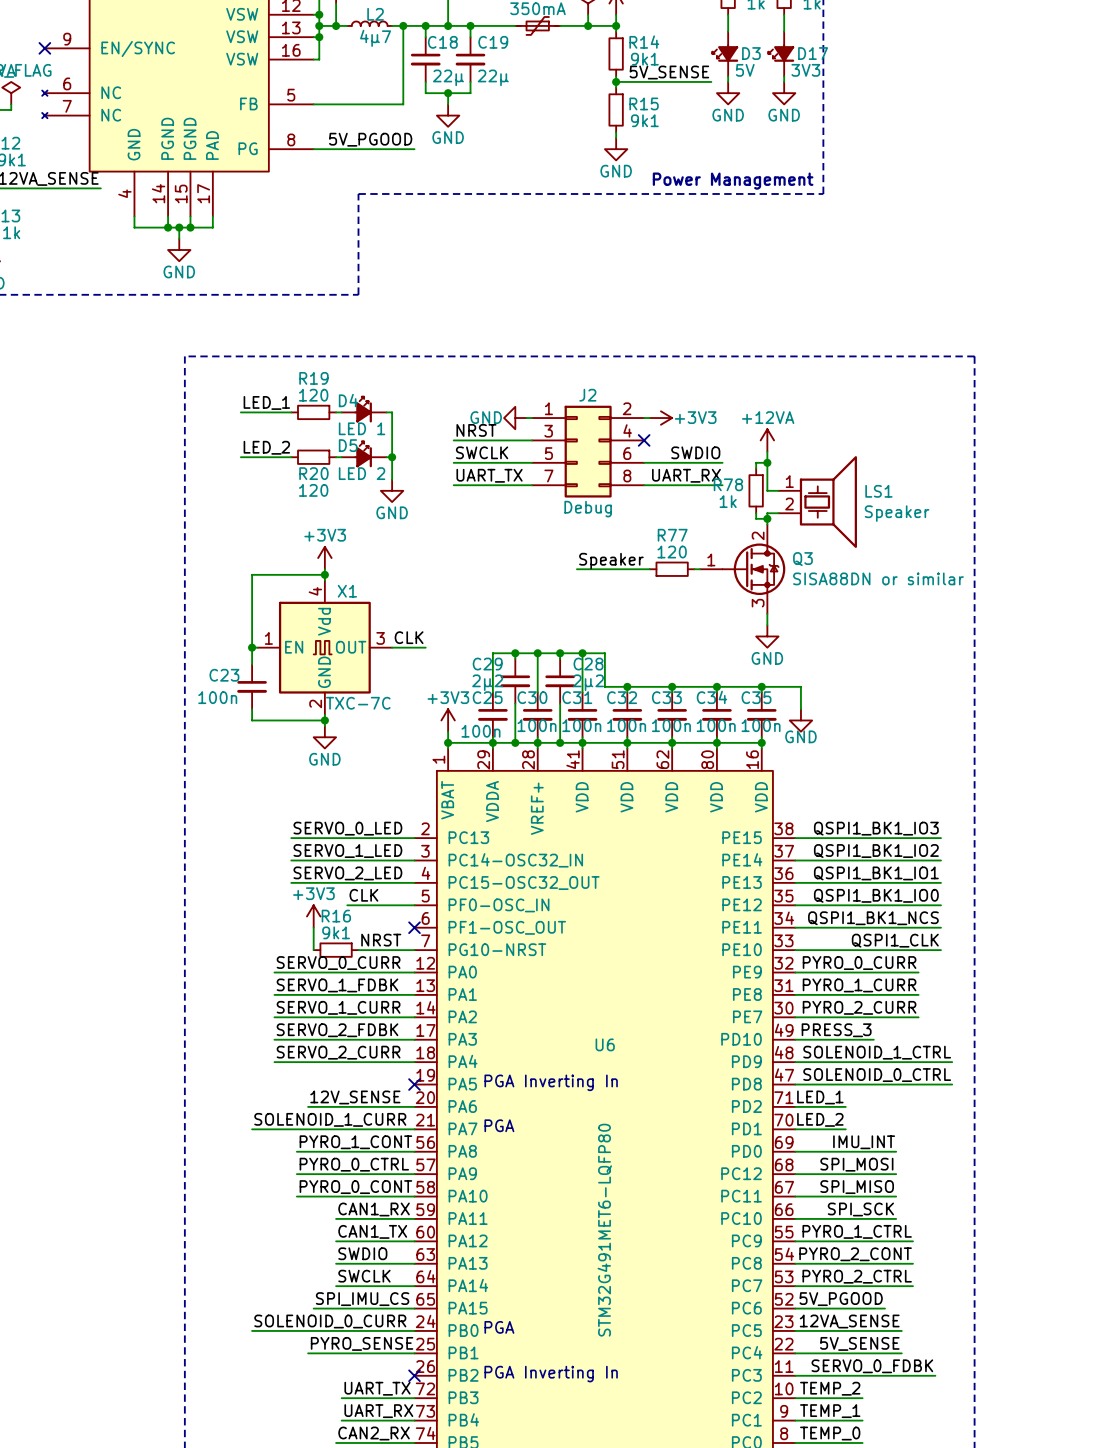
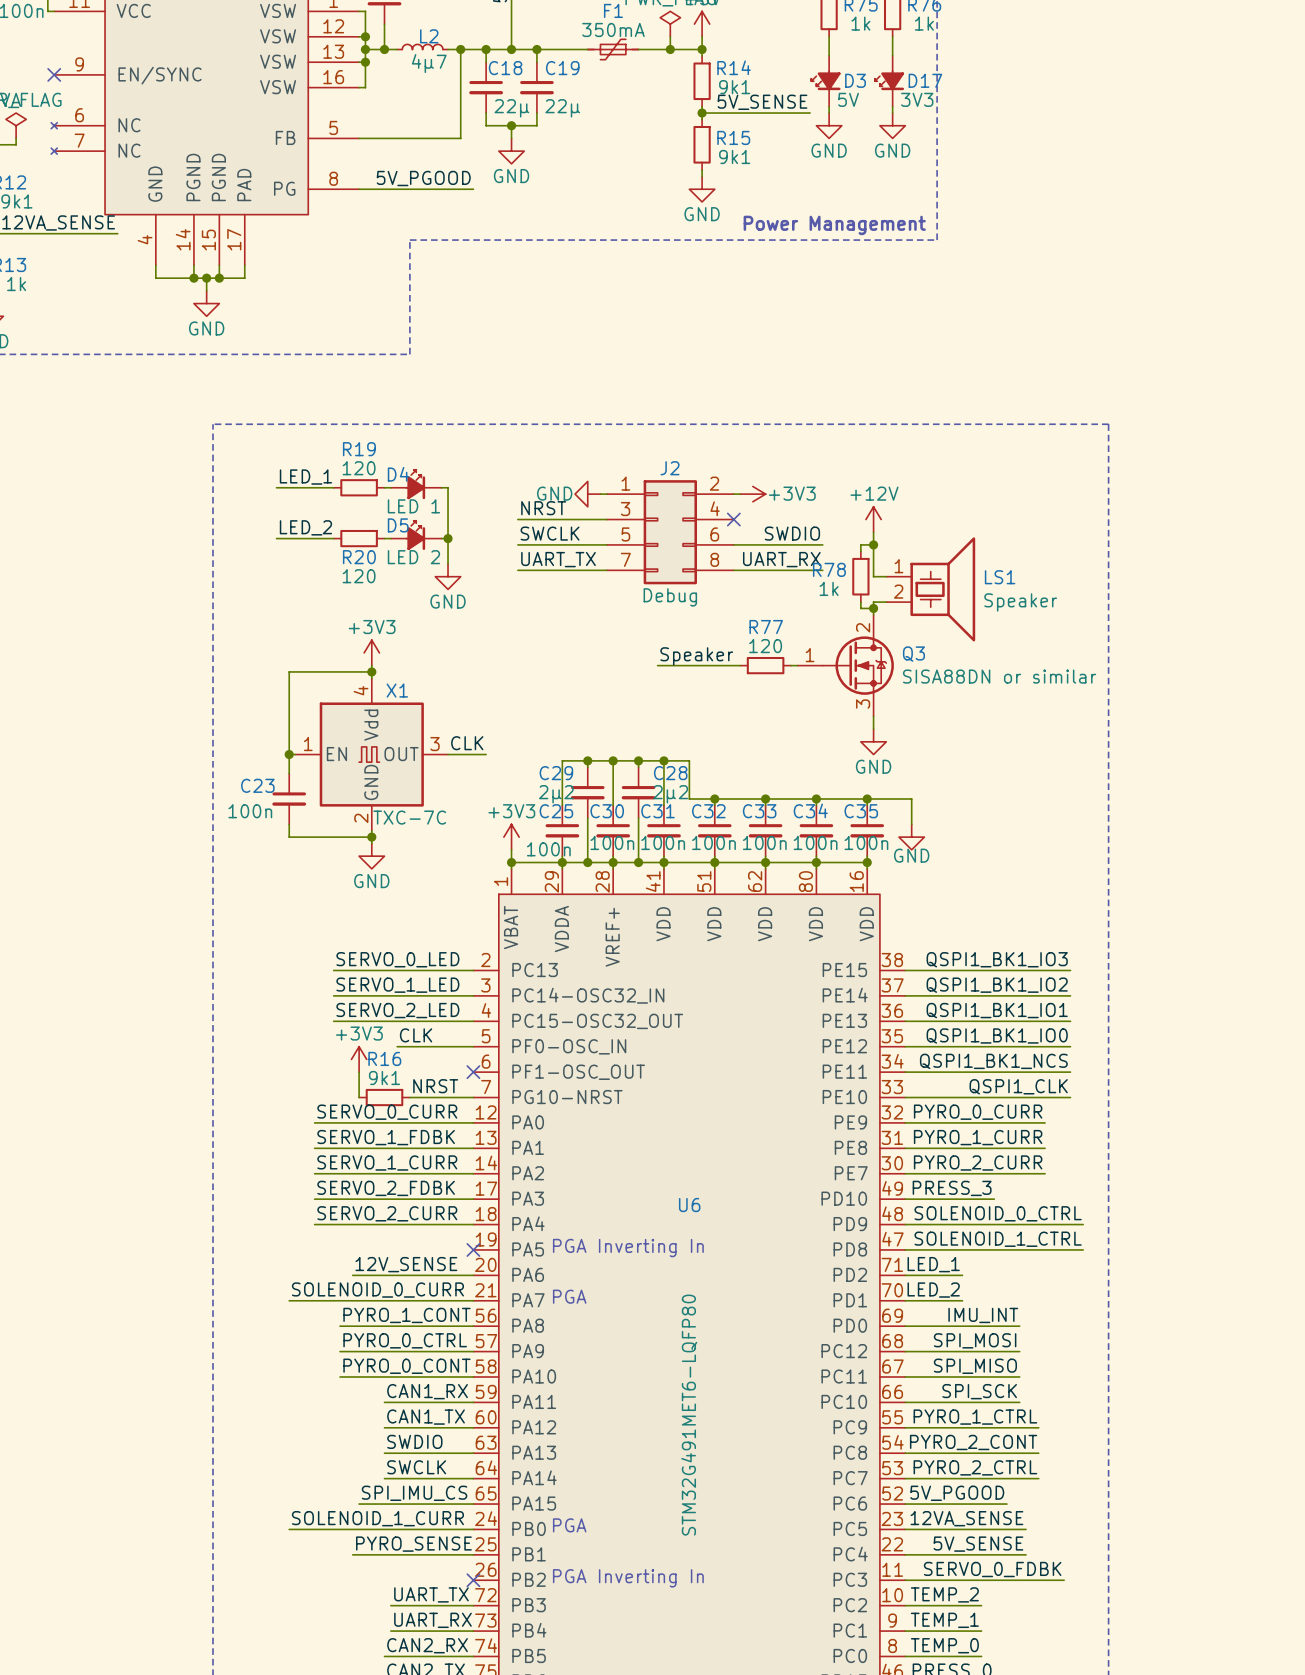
power symbol: +12VA (767, 440) -> +12V (873, 519)
label: SOLENOID_1_CTRL (877, 1052) -> SOLENOID_0_CTRL (998, 1213)
label: SOLENOID_0_CTRL (877, 1075) -> SOLENOID_1_CTRL (998, 1239)
label: SOLENOID_1_CURR (330, 1119) -> SOLENOID_0_CURR (377, 1290)
label: SOLENOID_0_CURR (330, 1321) -> SOLENOID_1_CURR (377, 1518)

